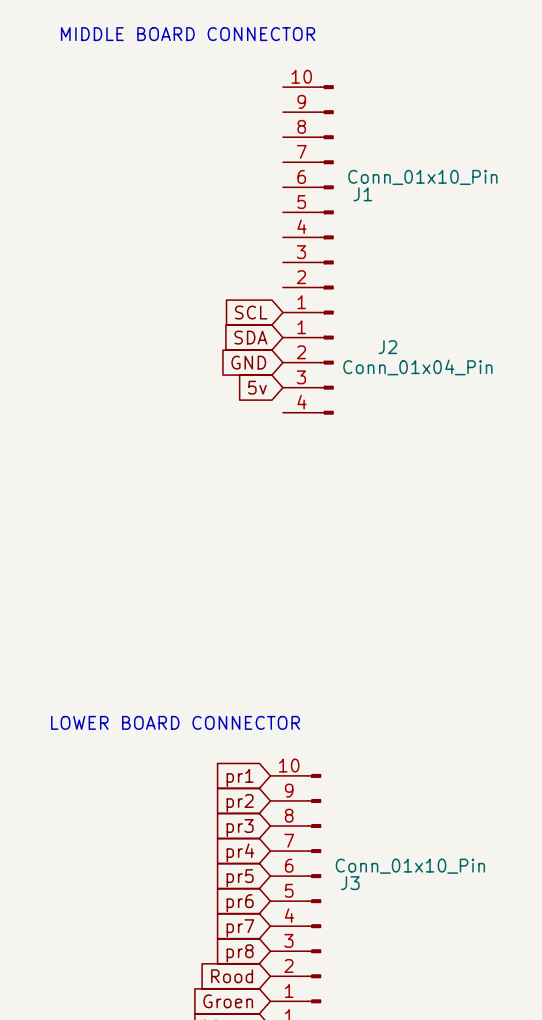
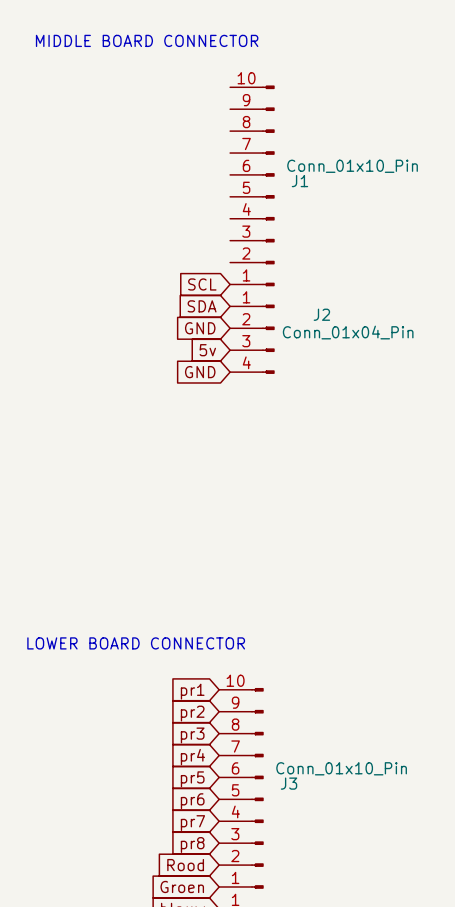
global label: none -> GND (200, 372)

